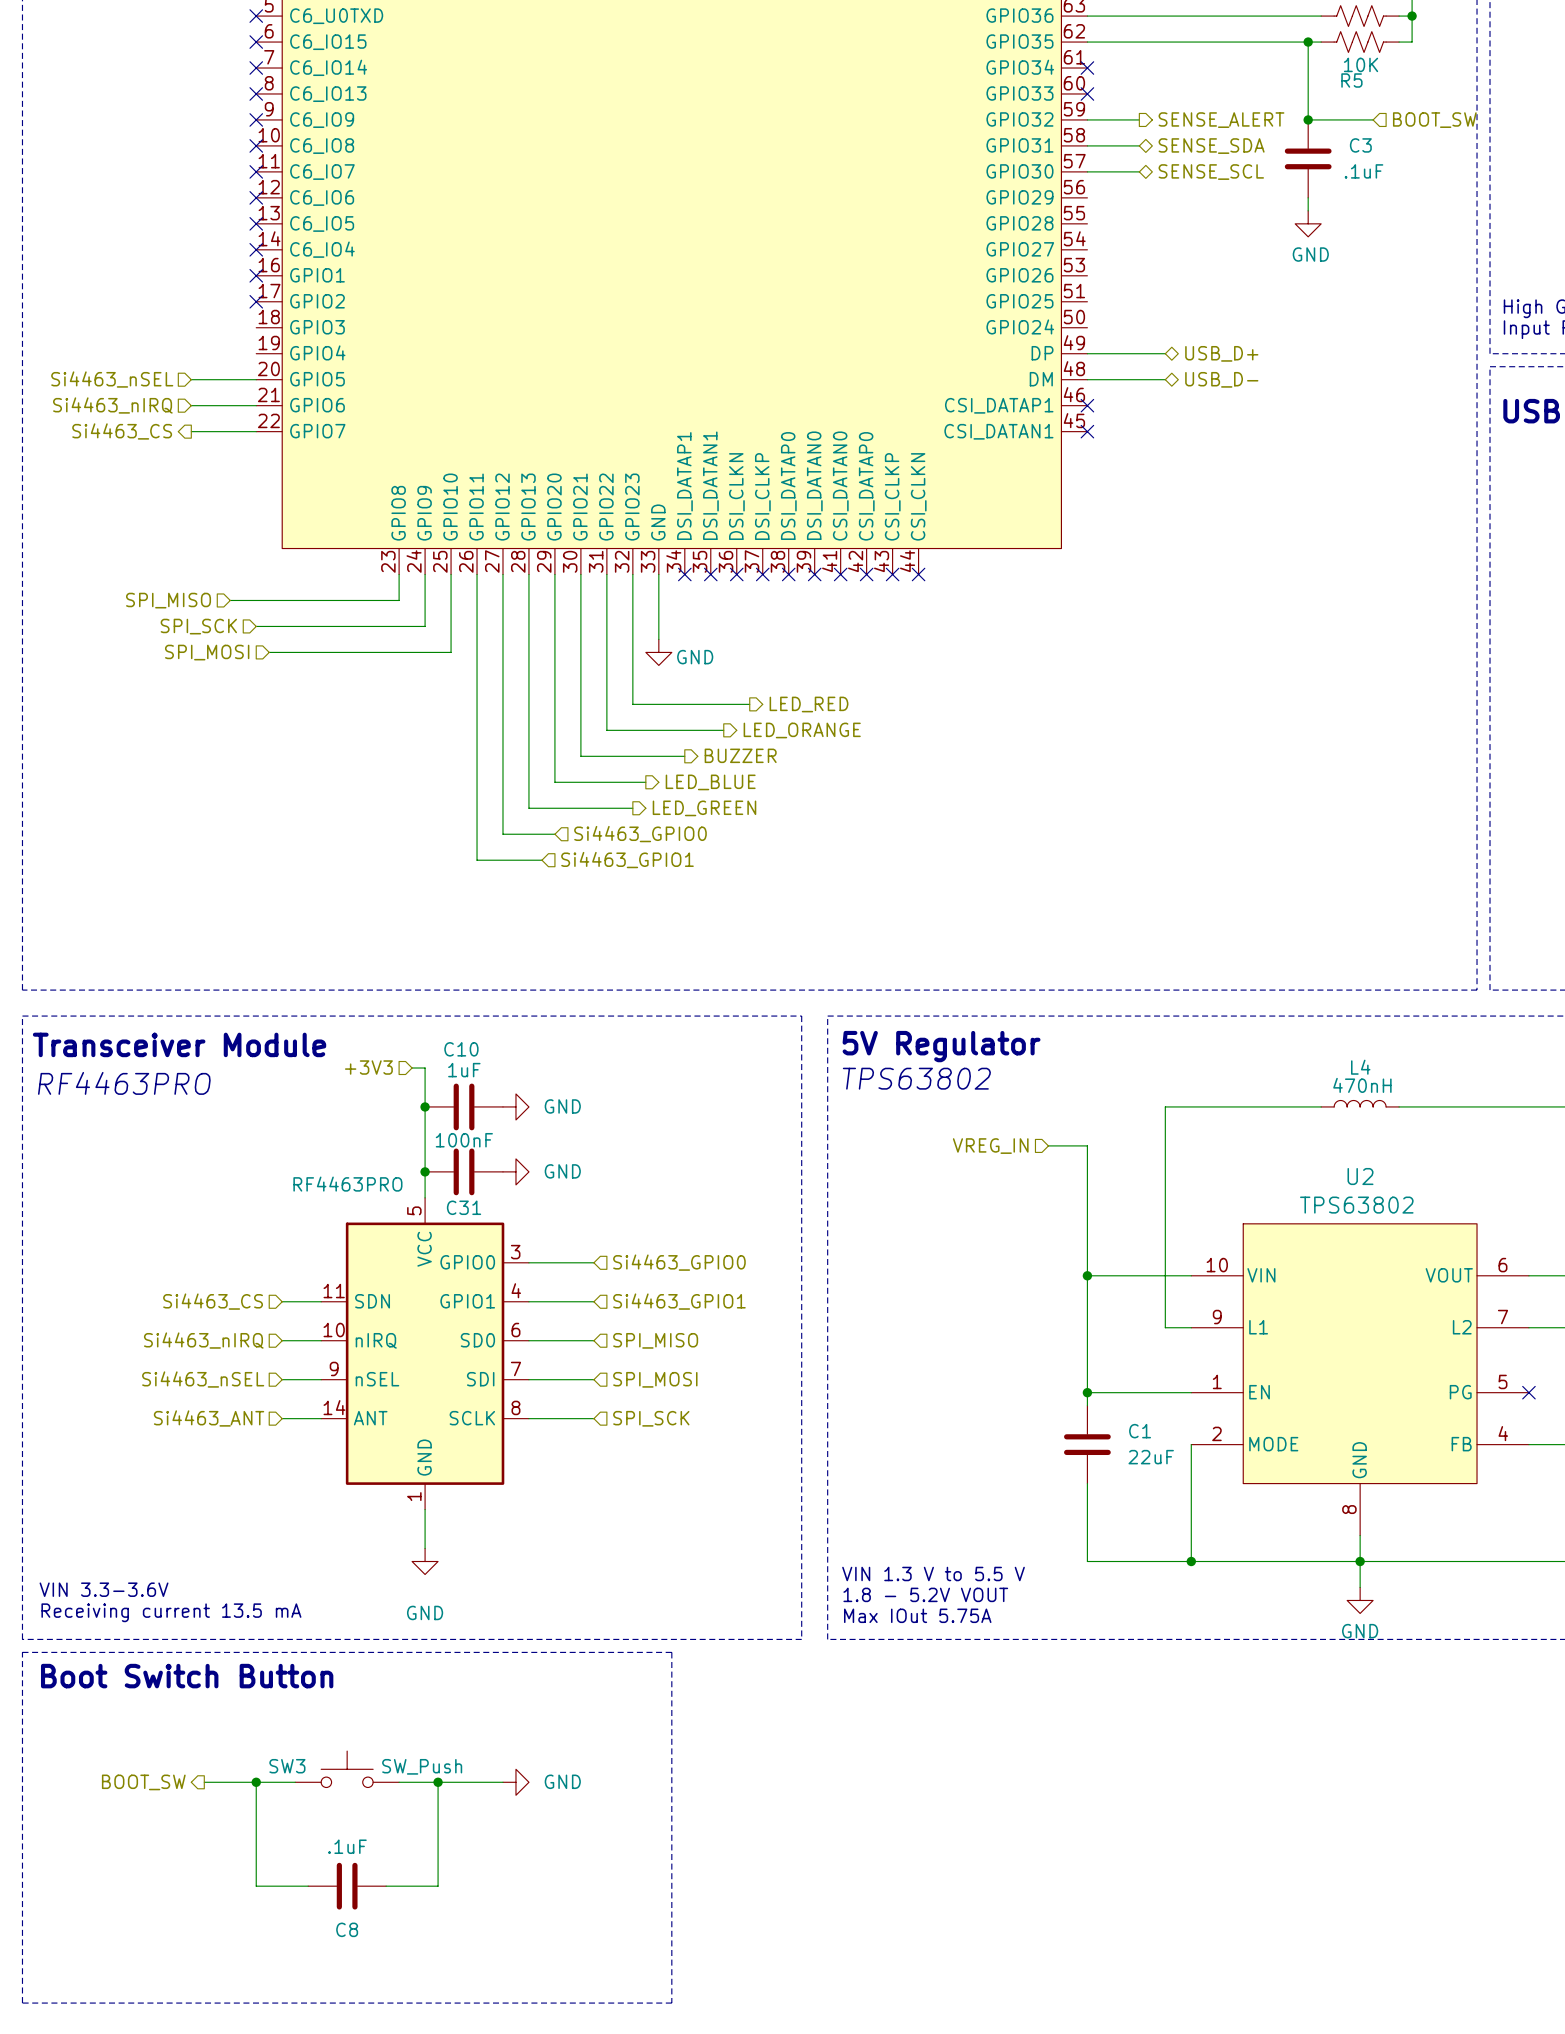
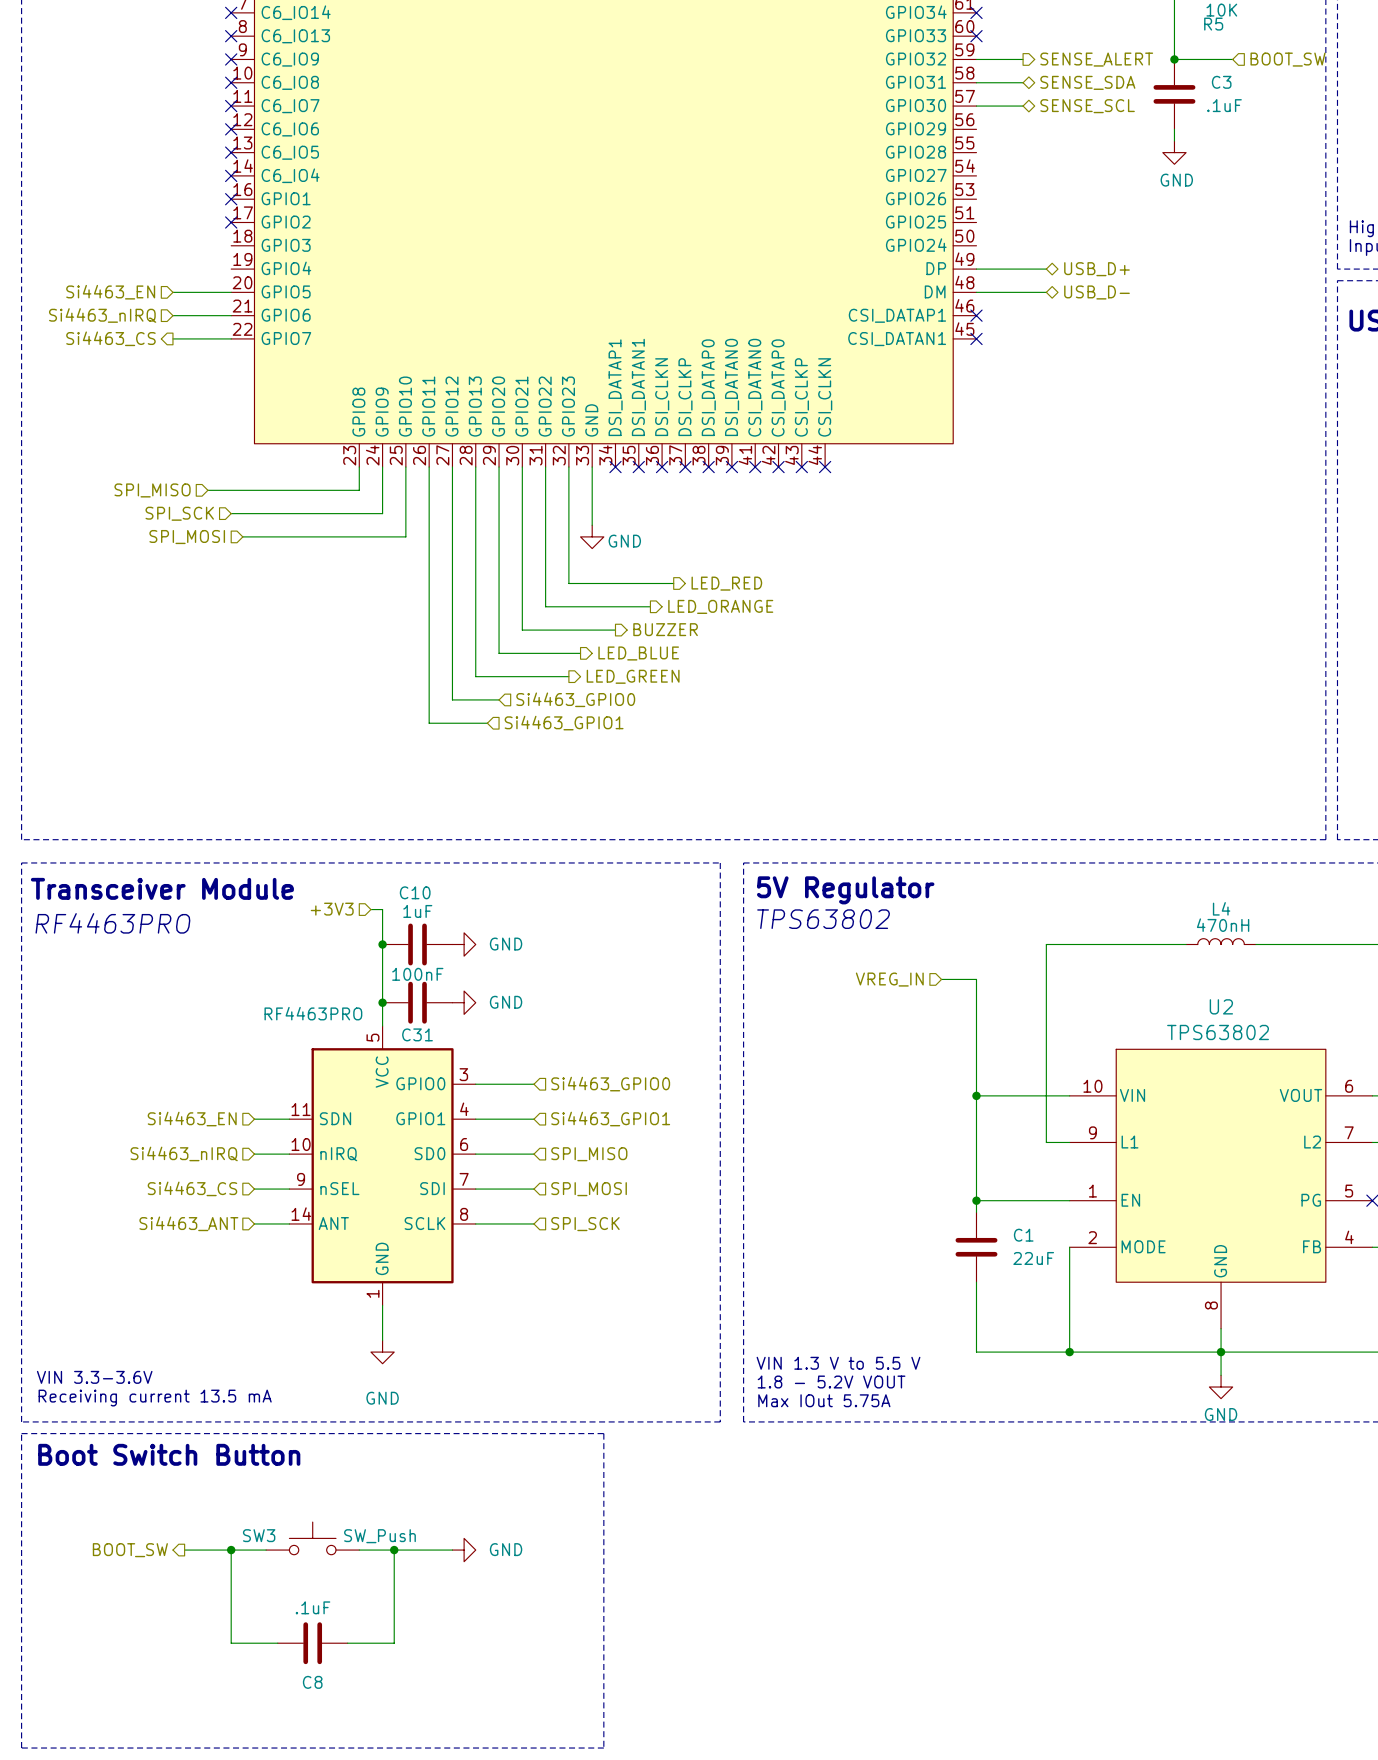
hierarchical label: Si4463_nSEL (112, 379) -> Si4463_EN (110, 292)
hierarchical label: Si4463_CS (213, 1301) -> Si4463_EN (192, 1119)
hierarchical label: Si4463_nSEL (203, 1379) -> Si4463_CS (192, 1188)

